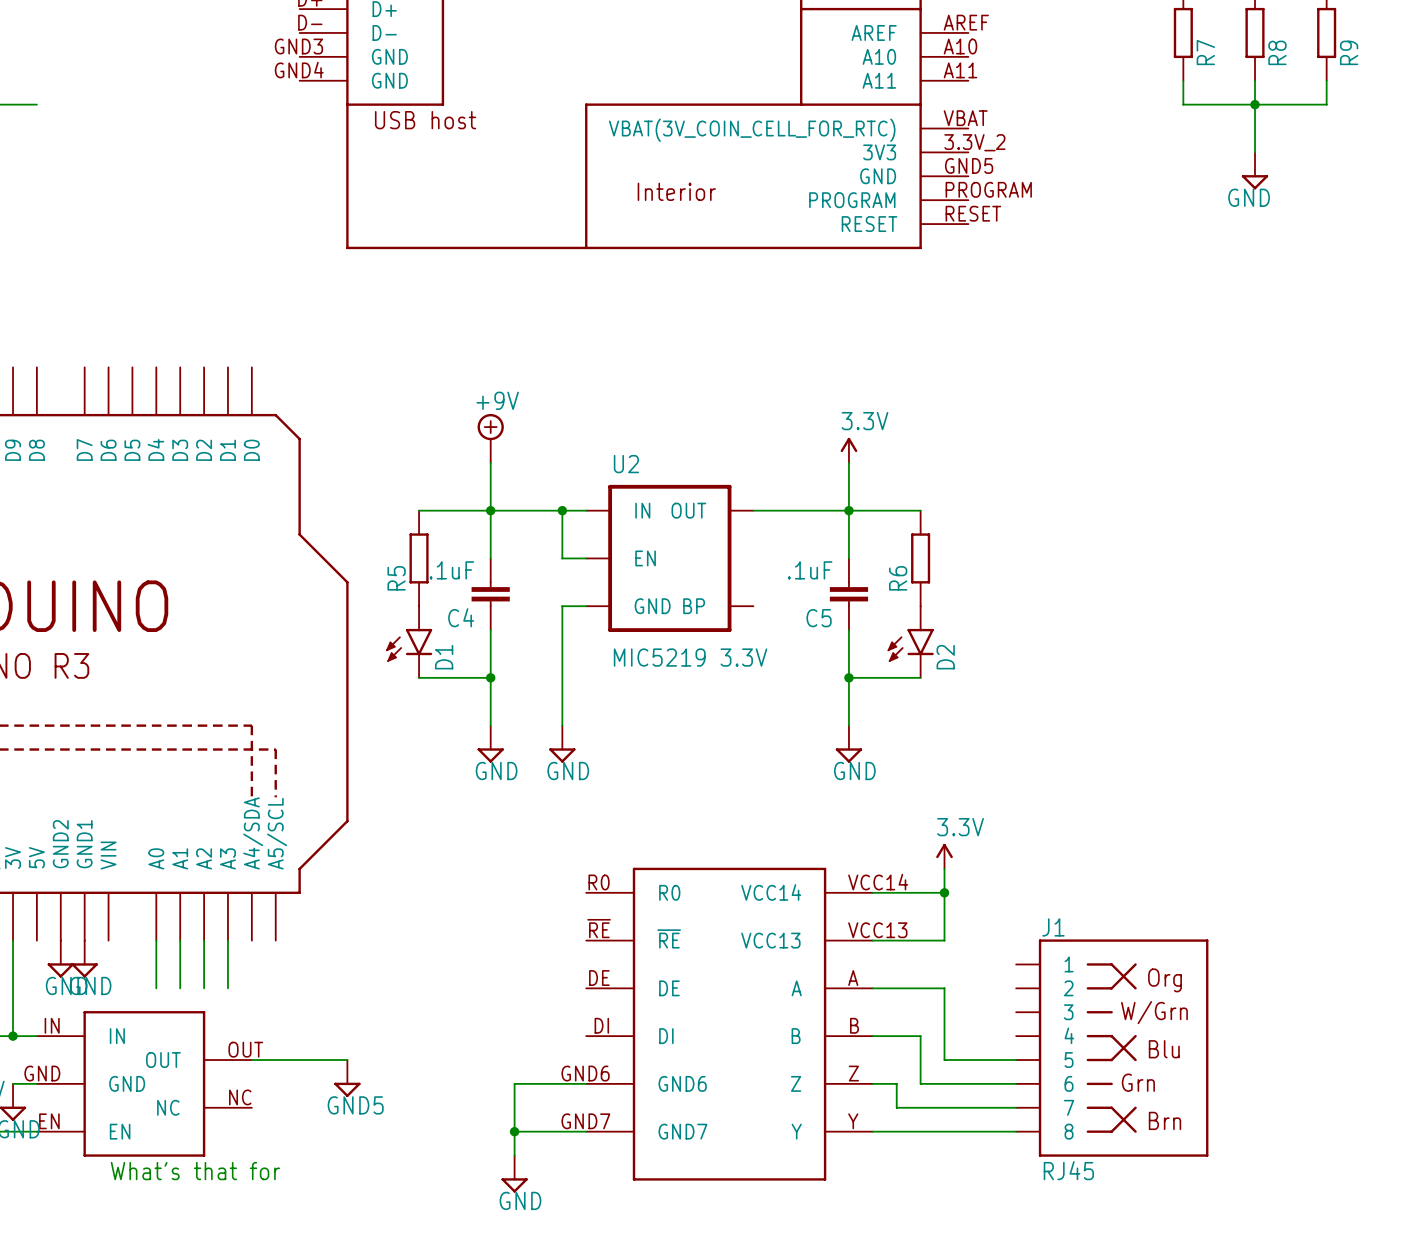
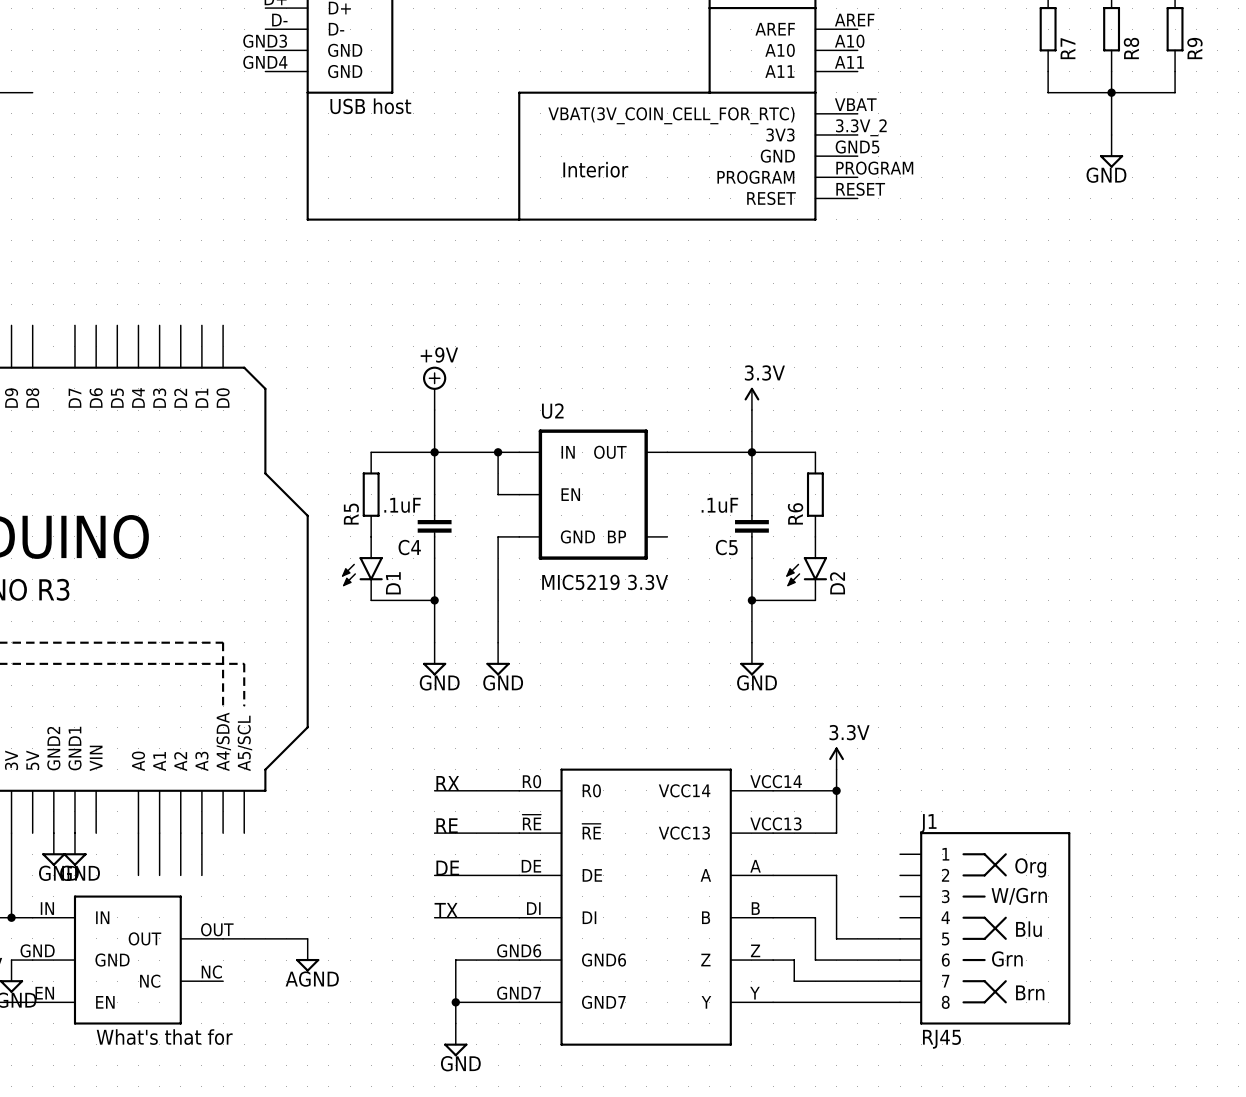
text: none -> RX (447, 783)
wire: none -> (434, 790) (519, 790)
text: none -> RE (447, 825)
wire: none -> (434, 833) (519, 833)
text: none -> DE (447, 868)
wire: none -> (434, 875) (519, 875)
text: none -> TX (446, 910)
wire: none -> (434, 917) (519, 917)
power symbol: GND5 (347, 1078) -> AGND (307, 955)

